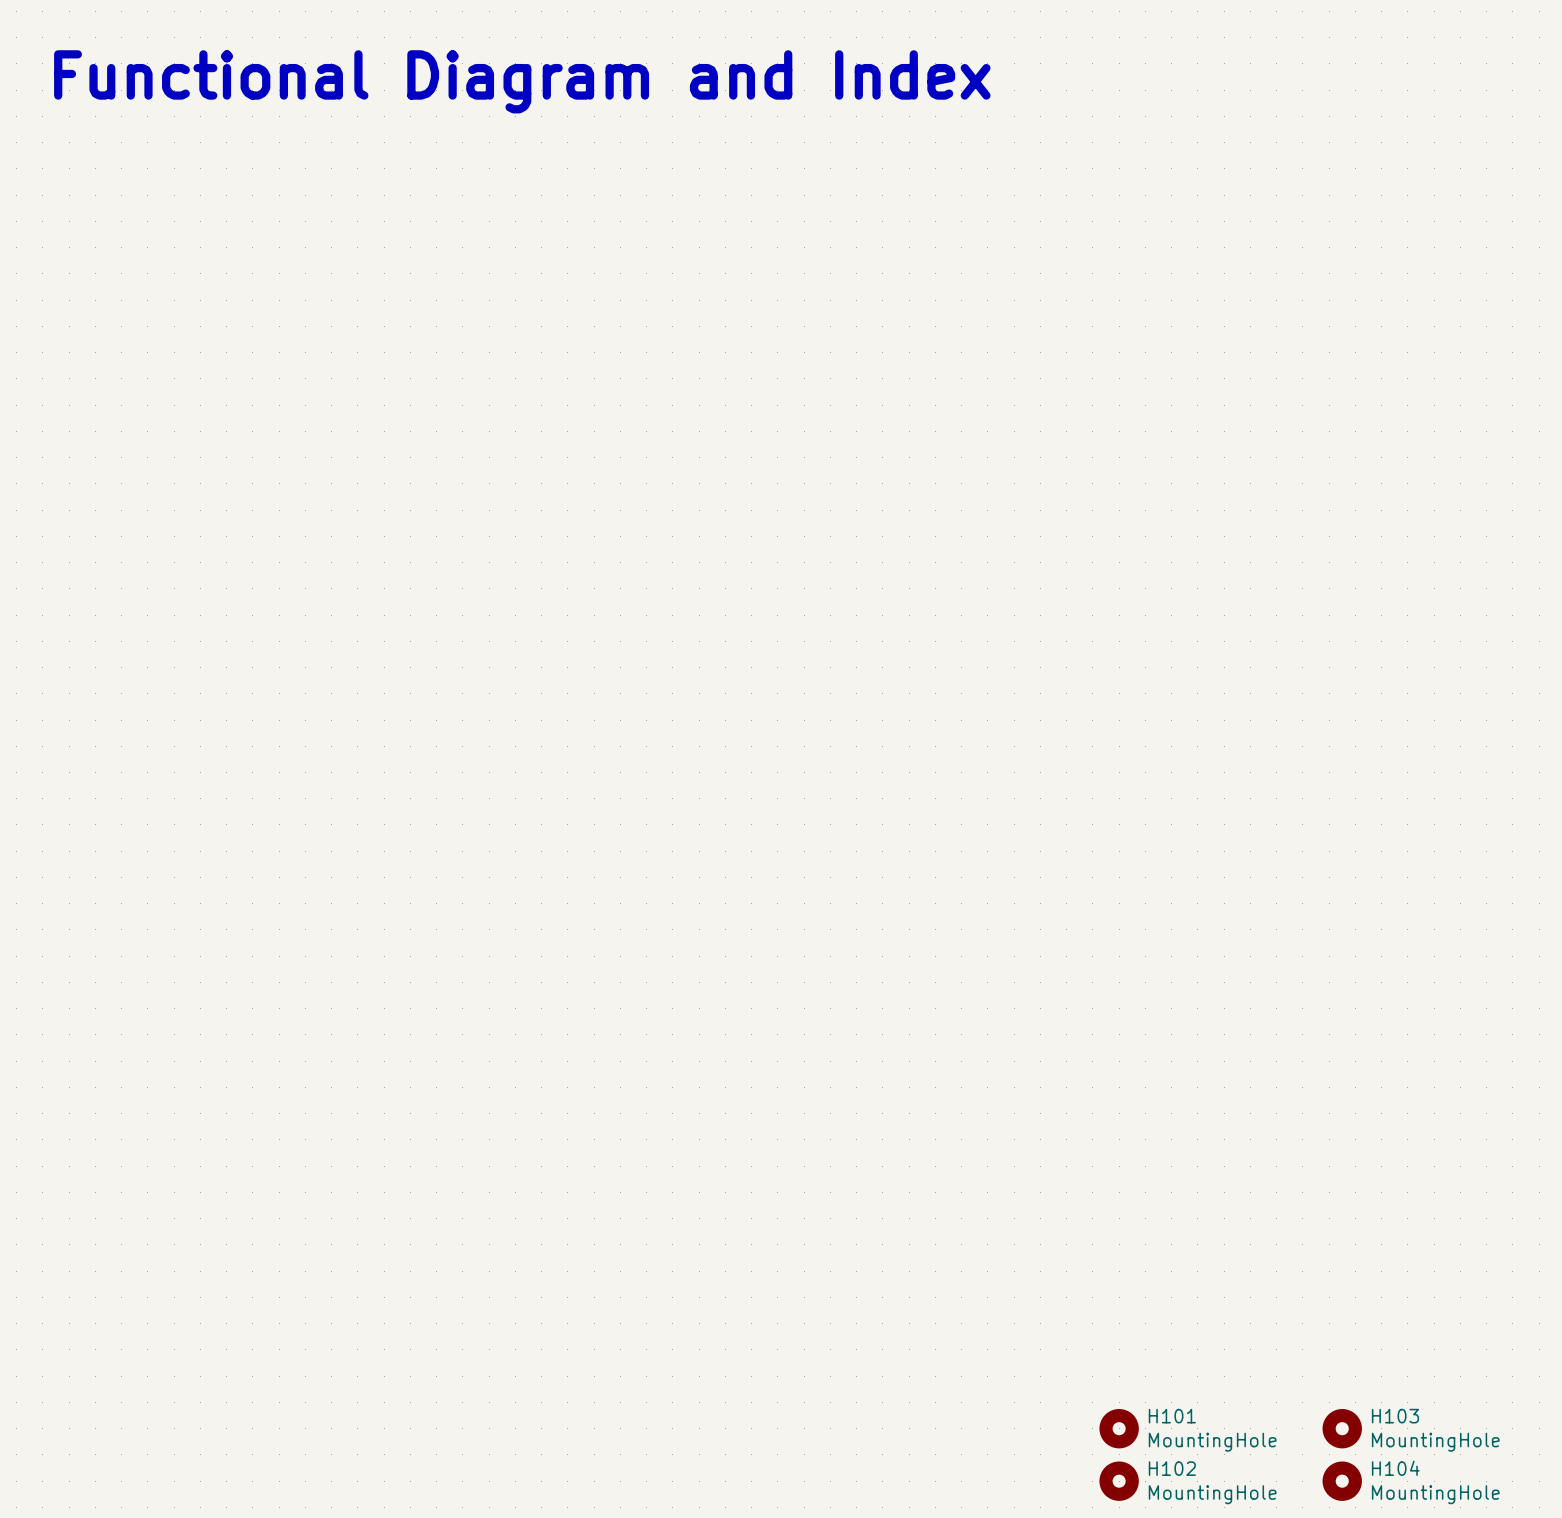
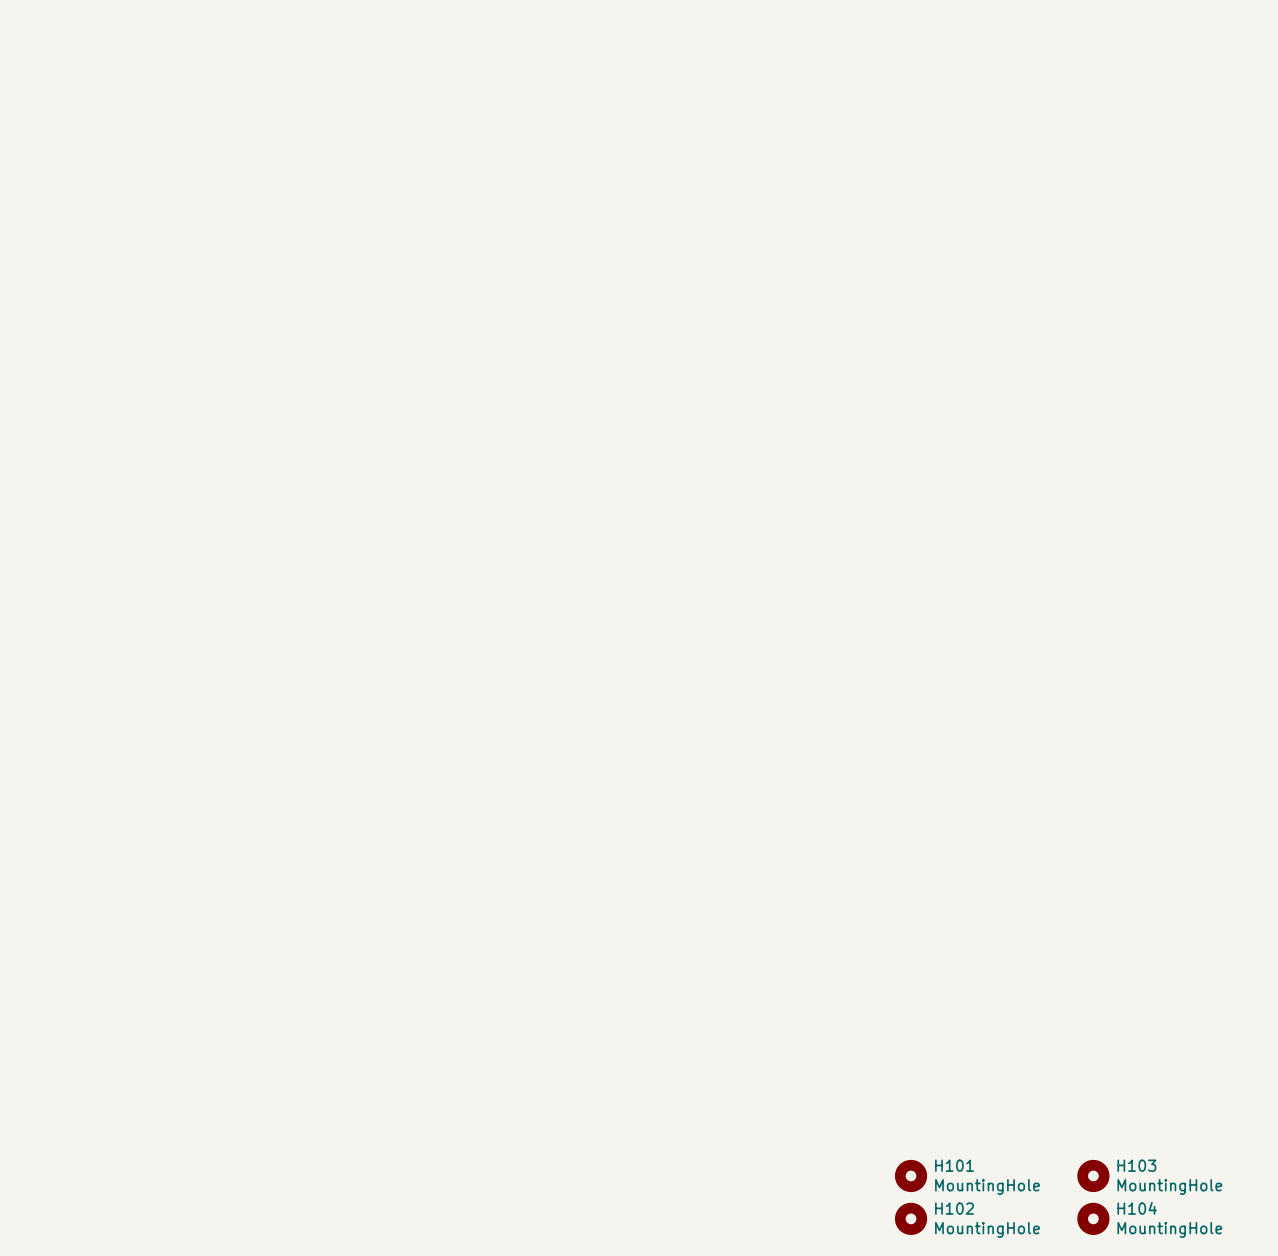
text: Functional Diagram and Index (522, 81) -> none

